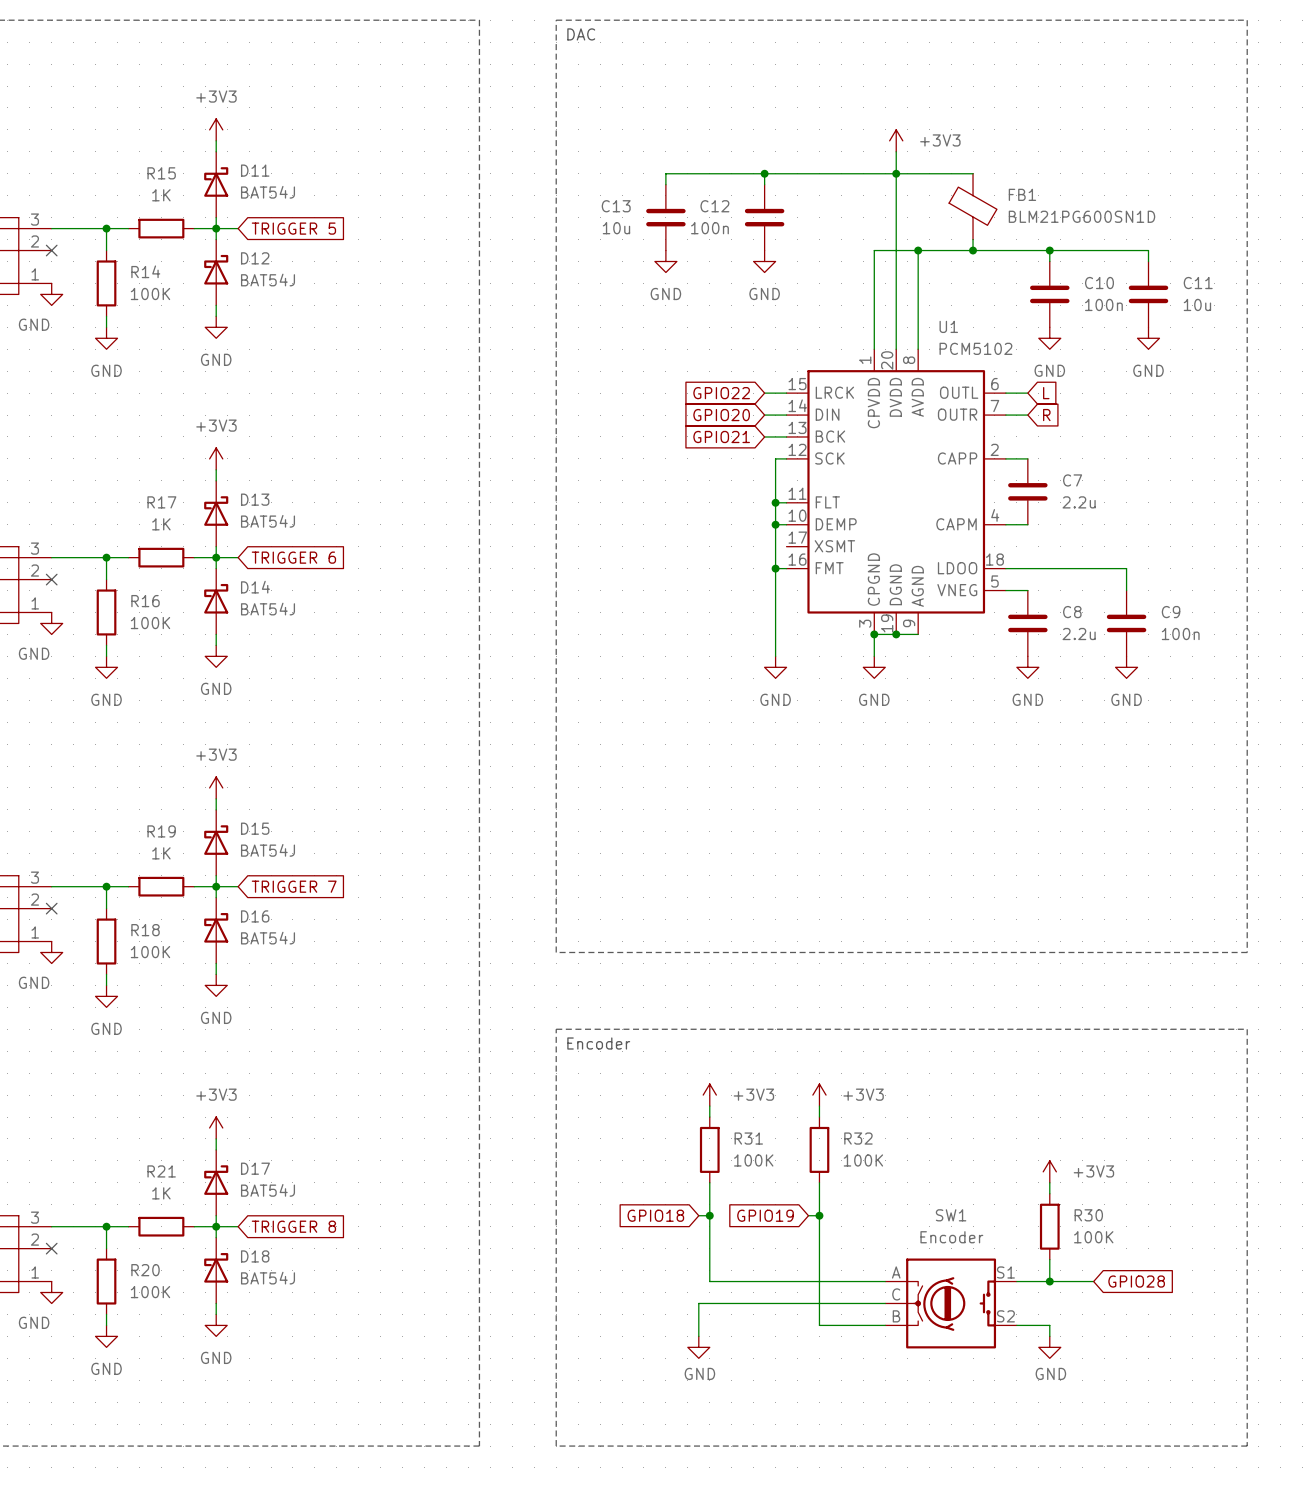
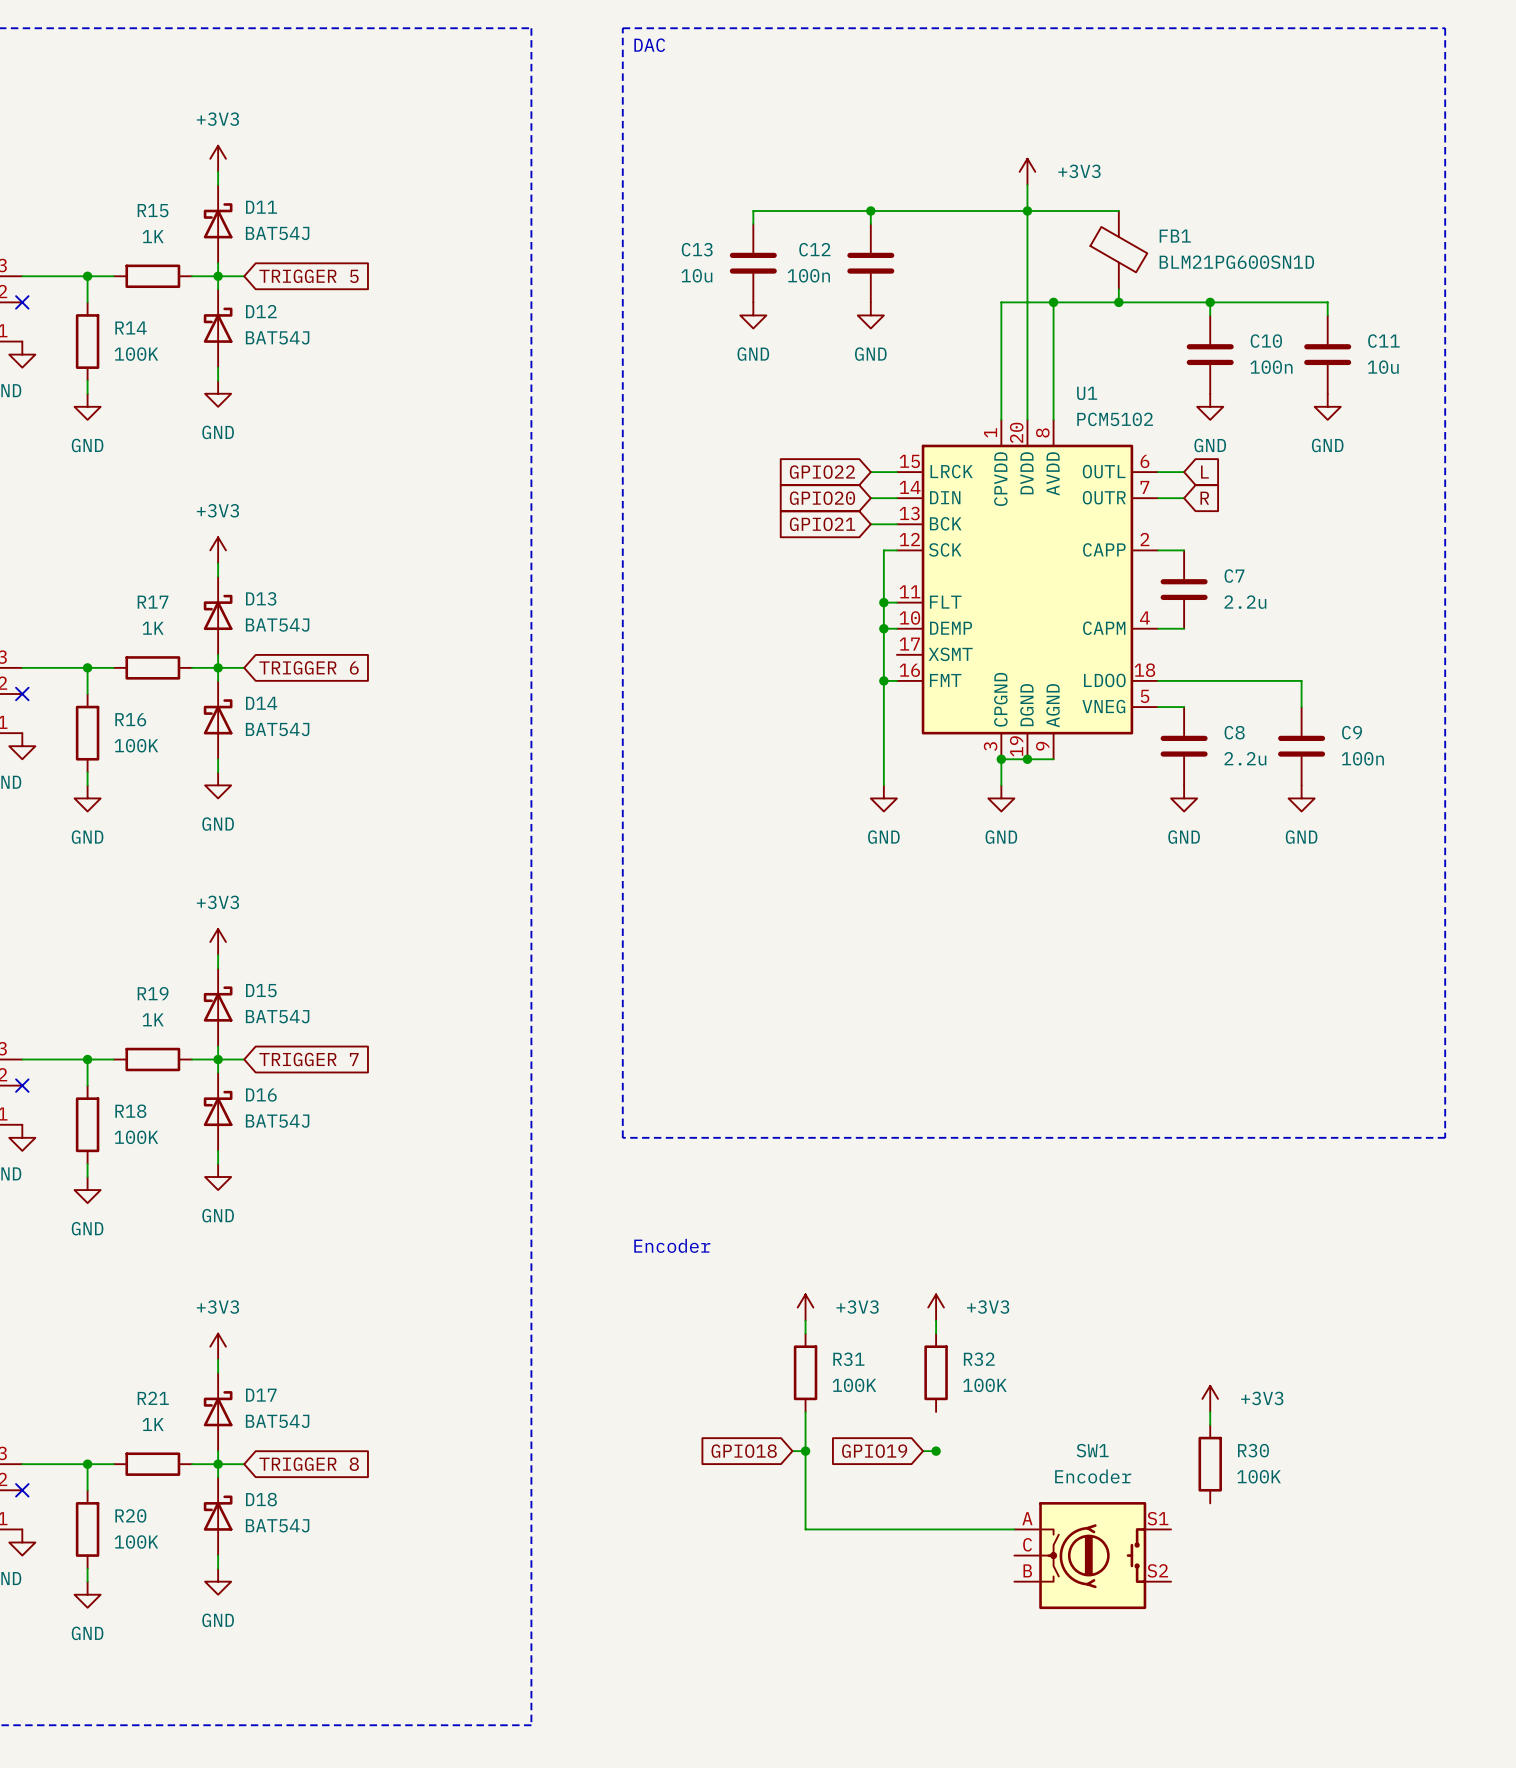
line: (556, 1029) (1247, 1029) (1247, 1446) (556, 1446) (556, 1029) -> none
wire: (819, 1182) (819, 1325) (885, 1325) -> none
wire: (1049, 1259) (1049, 1281) -> none
wire: (1016, 1281) (1093, 1281) -> none
junction: (1049, 1281) -> none
global label: GPIO28 (1136, 1281) -> none
wire: (885, 1303) (698, 1303) (698, 1336) -> none
wire: (1016, 1325) (1049, 1325) (1049, 1336) -> none
power symbol: GND (698, 1347) -> none
power symbol: GND (1049, 1347) -> none

